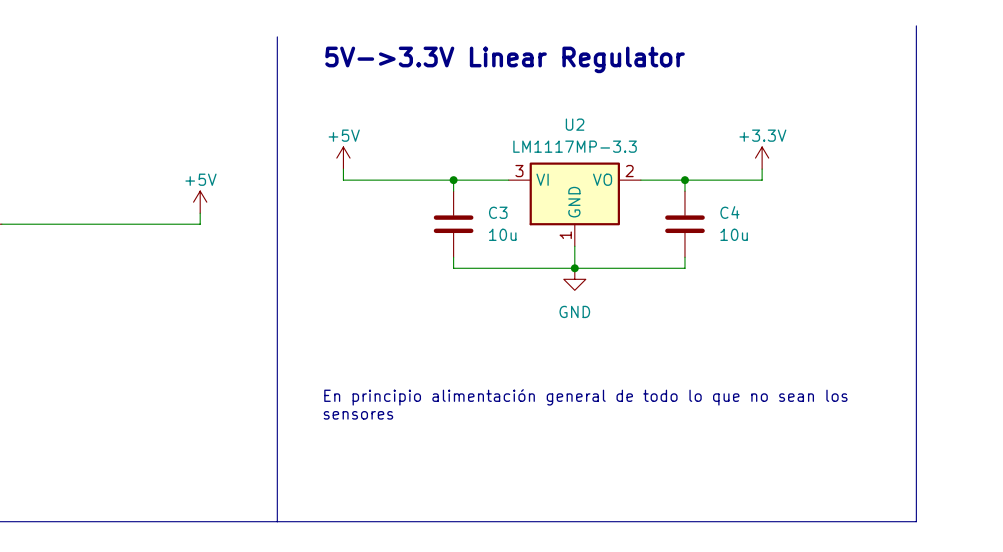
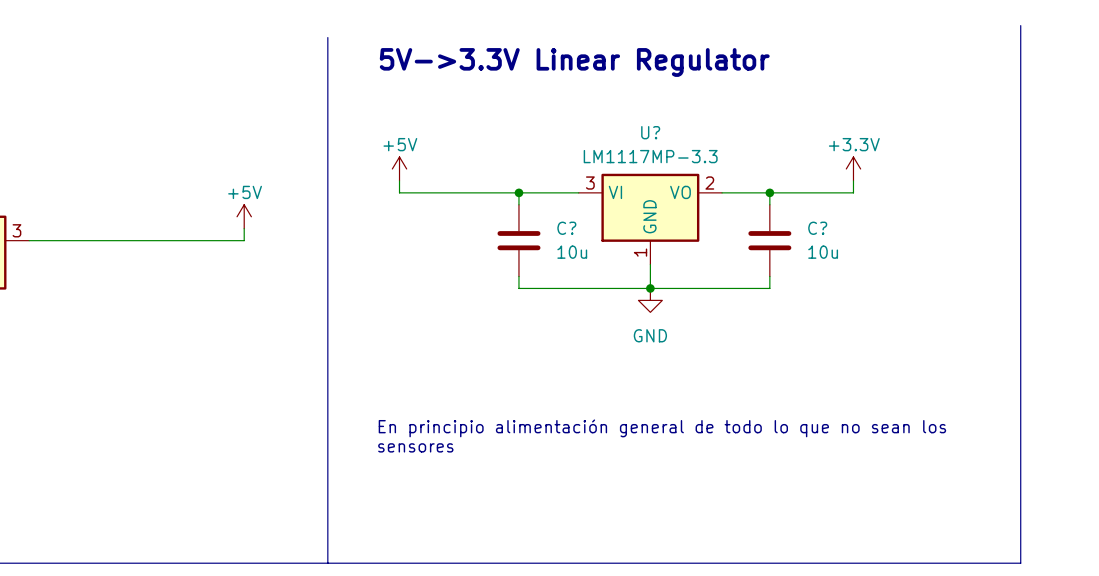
U2 name: U2 (575, 124) -> U? (650, 132)
C3 name: C3 (498, 212) -> C? (566, 228)
C4 name: C4 (729, 212) -> C? (817, 228)

